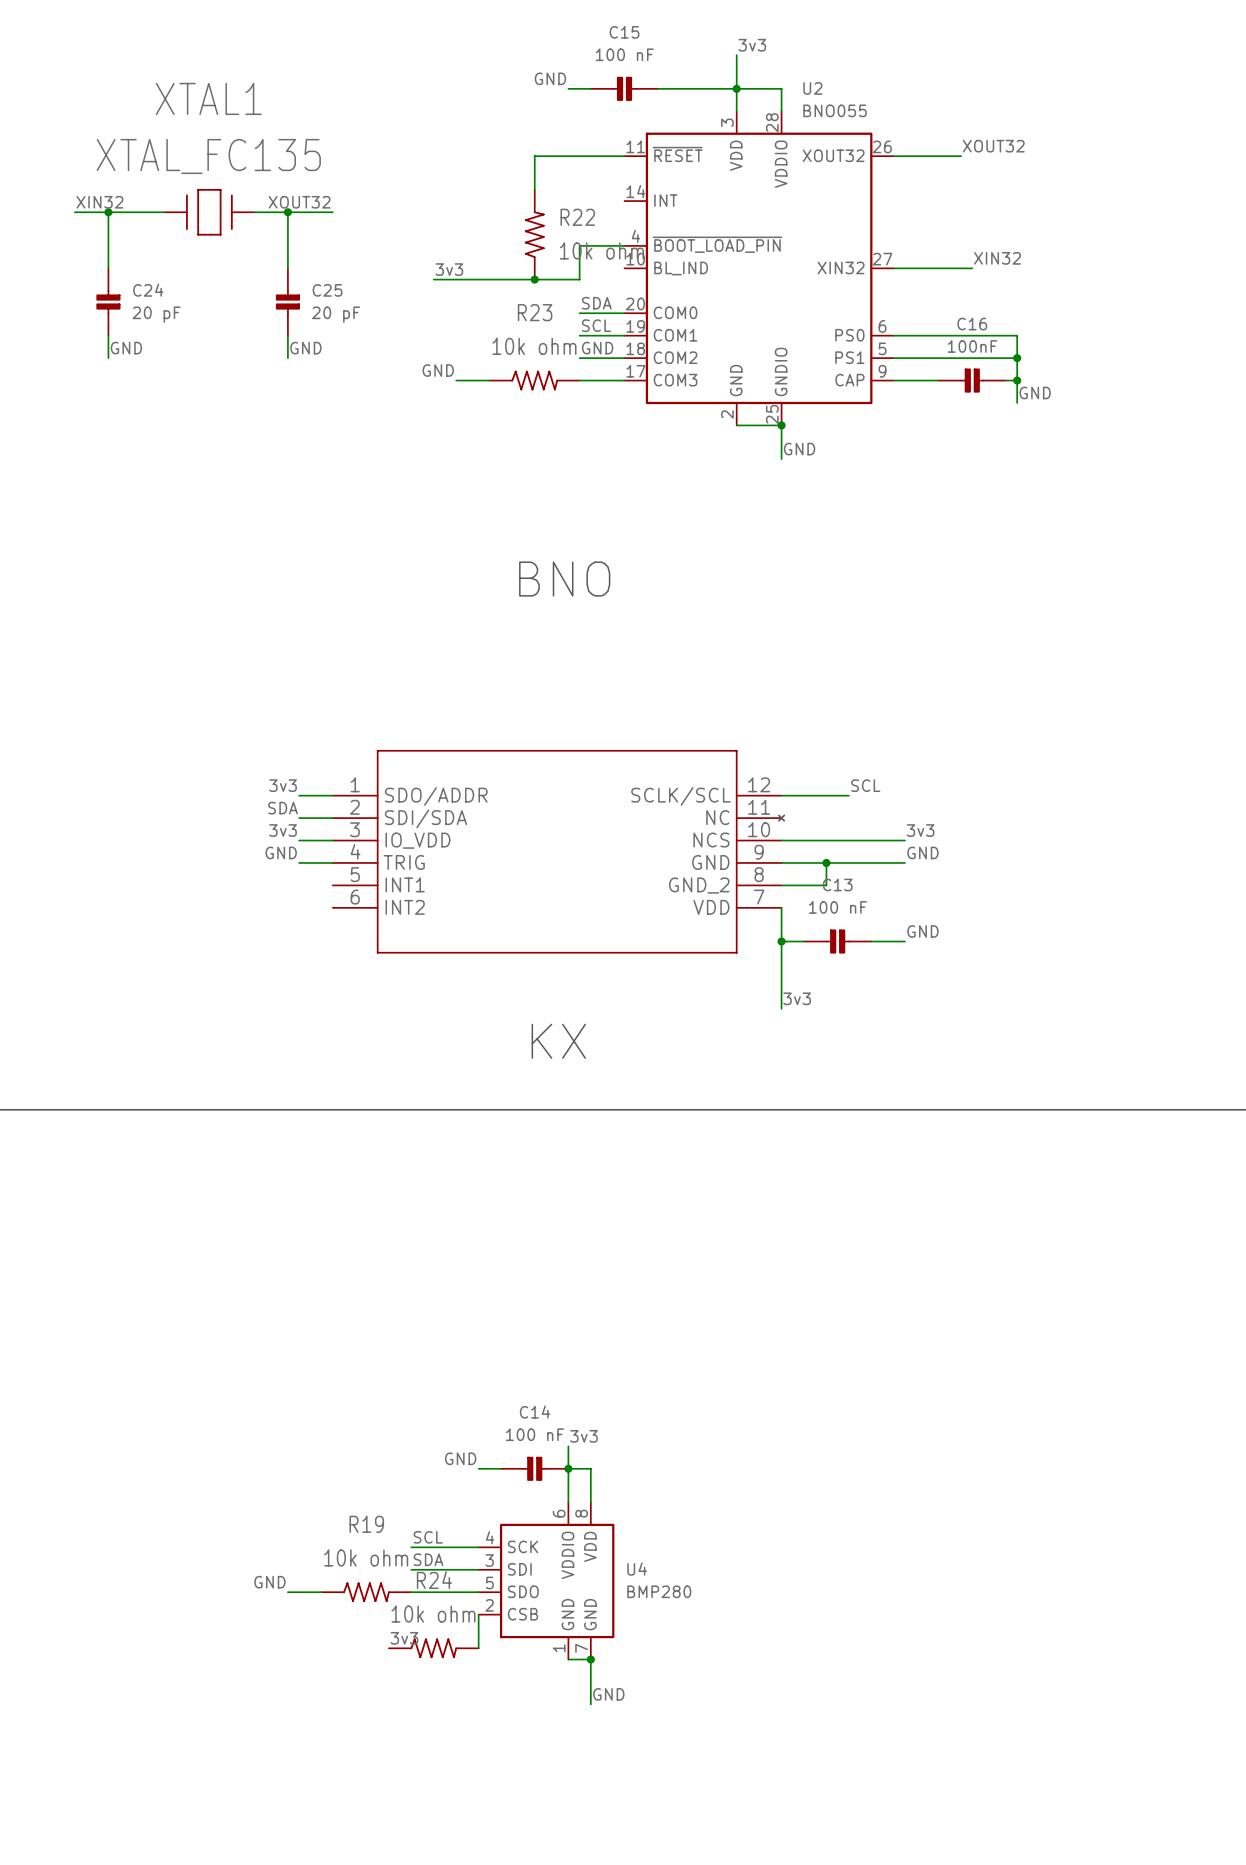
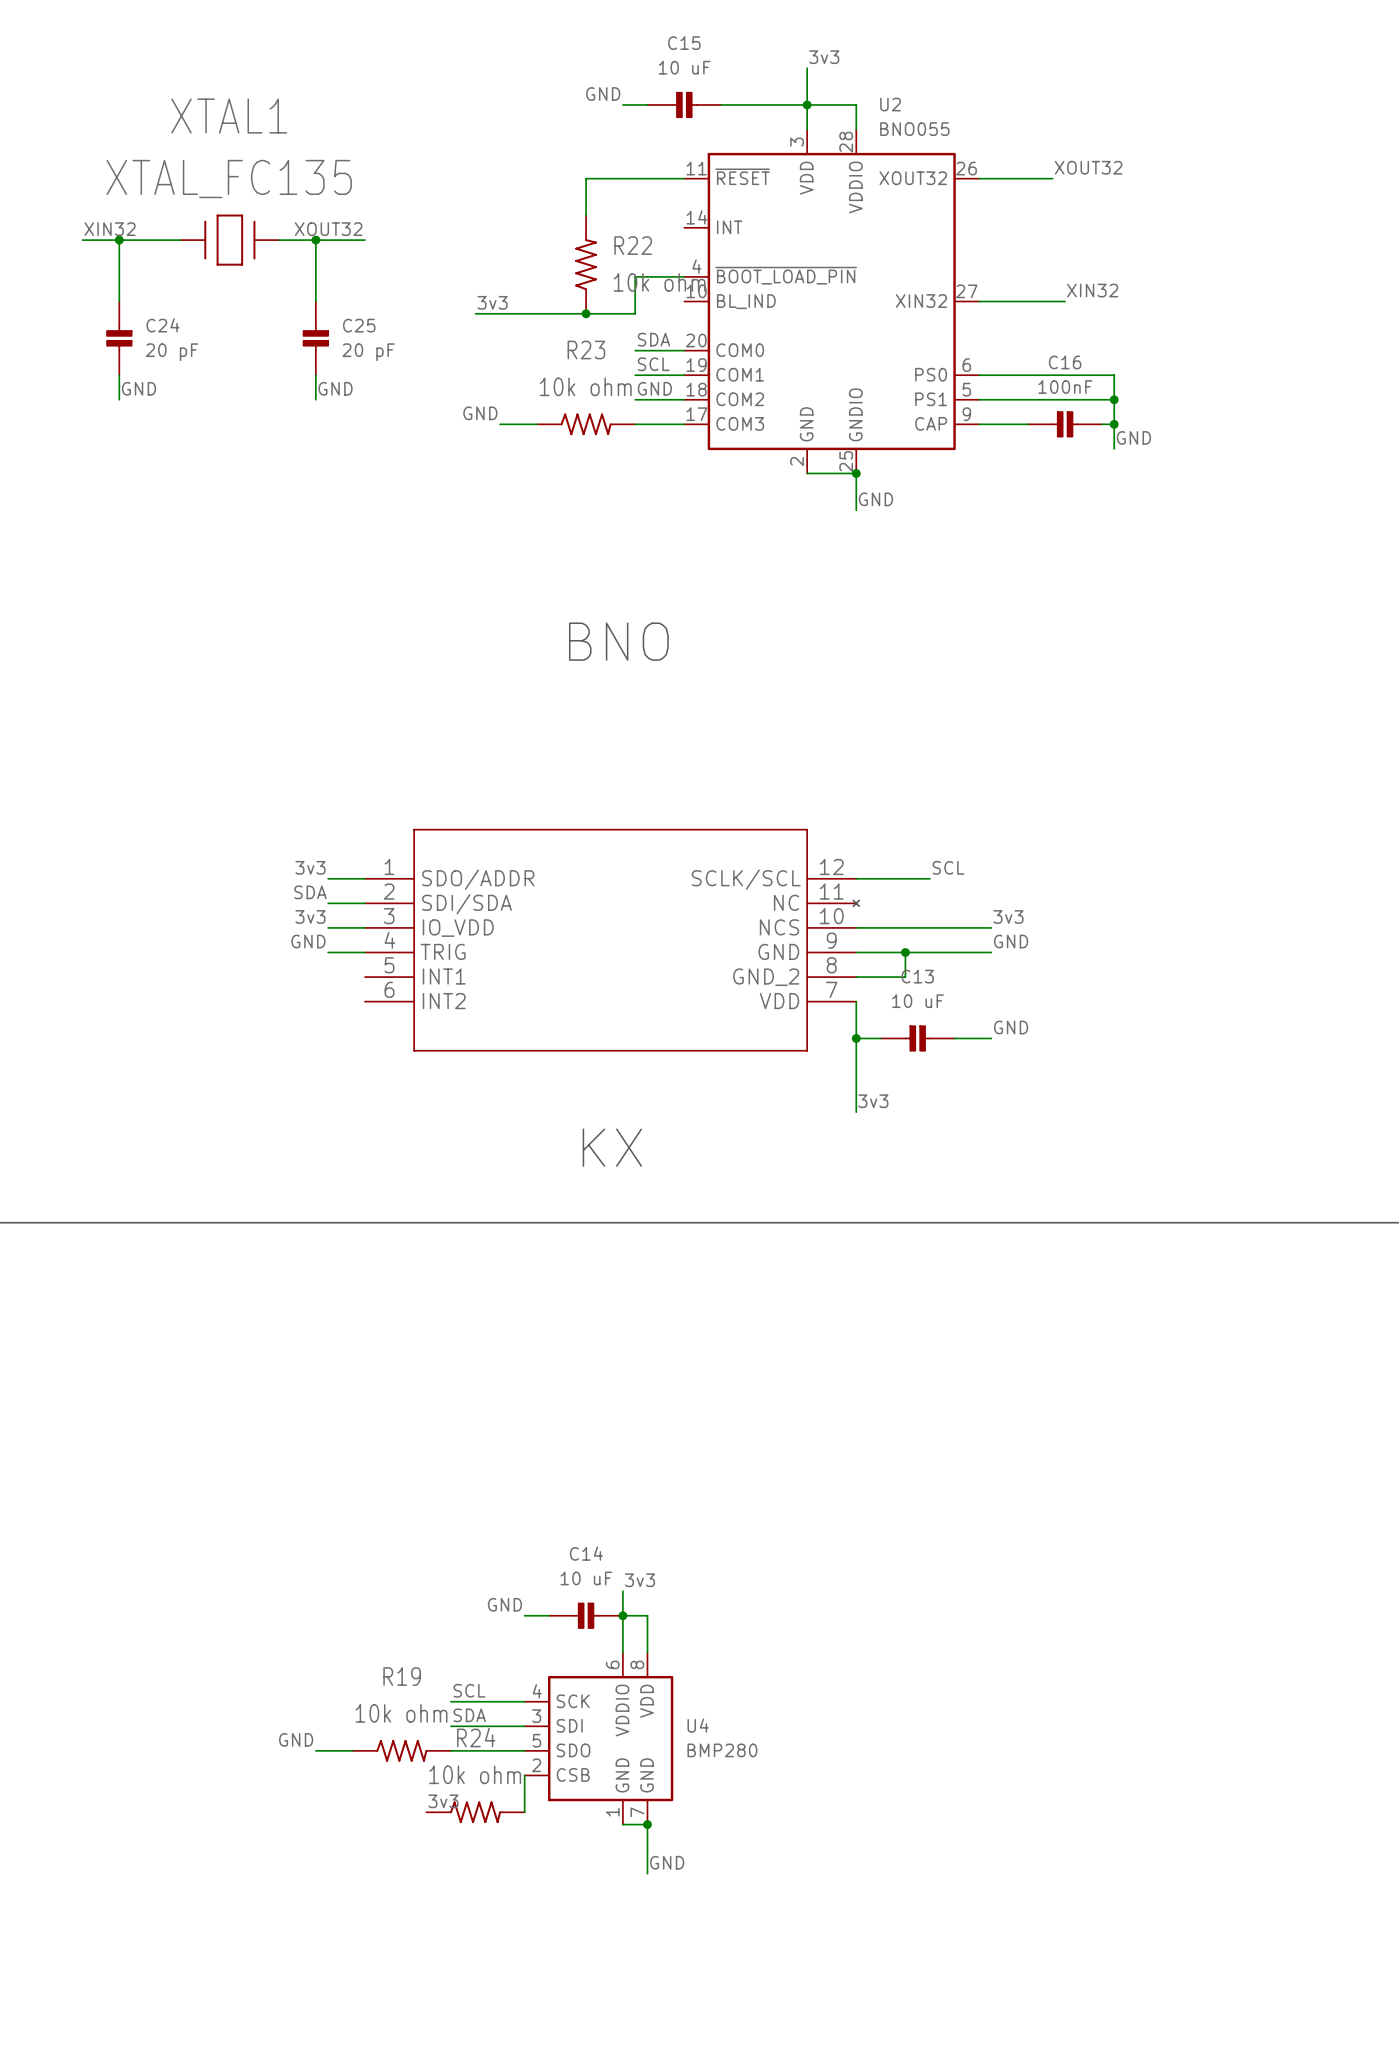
C15 value: 100 nF (624, 54) -> 10 uF (684, 67)
C13 value: 100 nF (837, 907) -> 10 uF (917, 1001)
C14 value: 100 nF (535, 1434) -> 10 uF (586, 1578)

